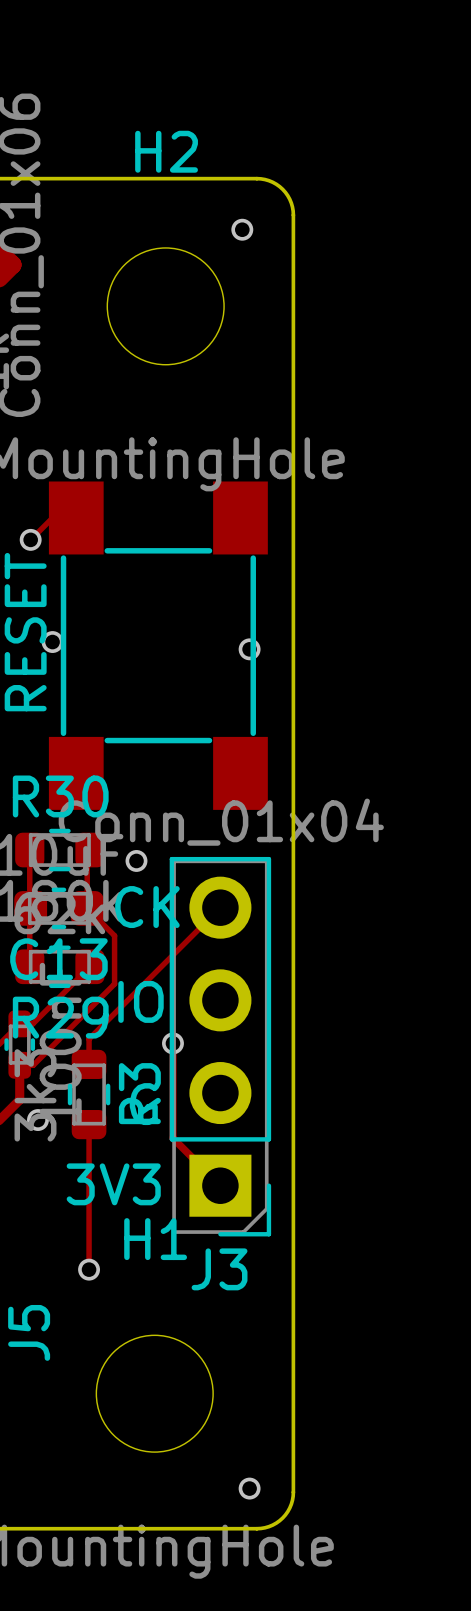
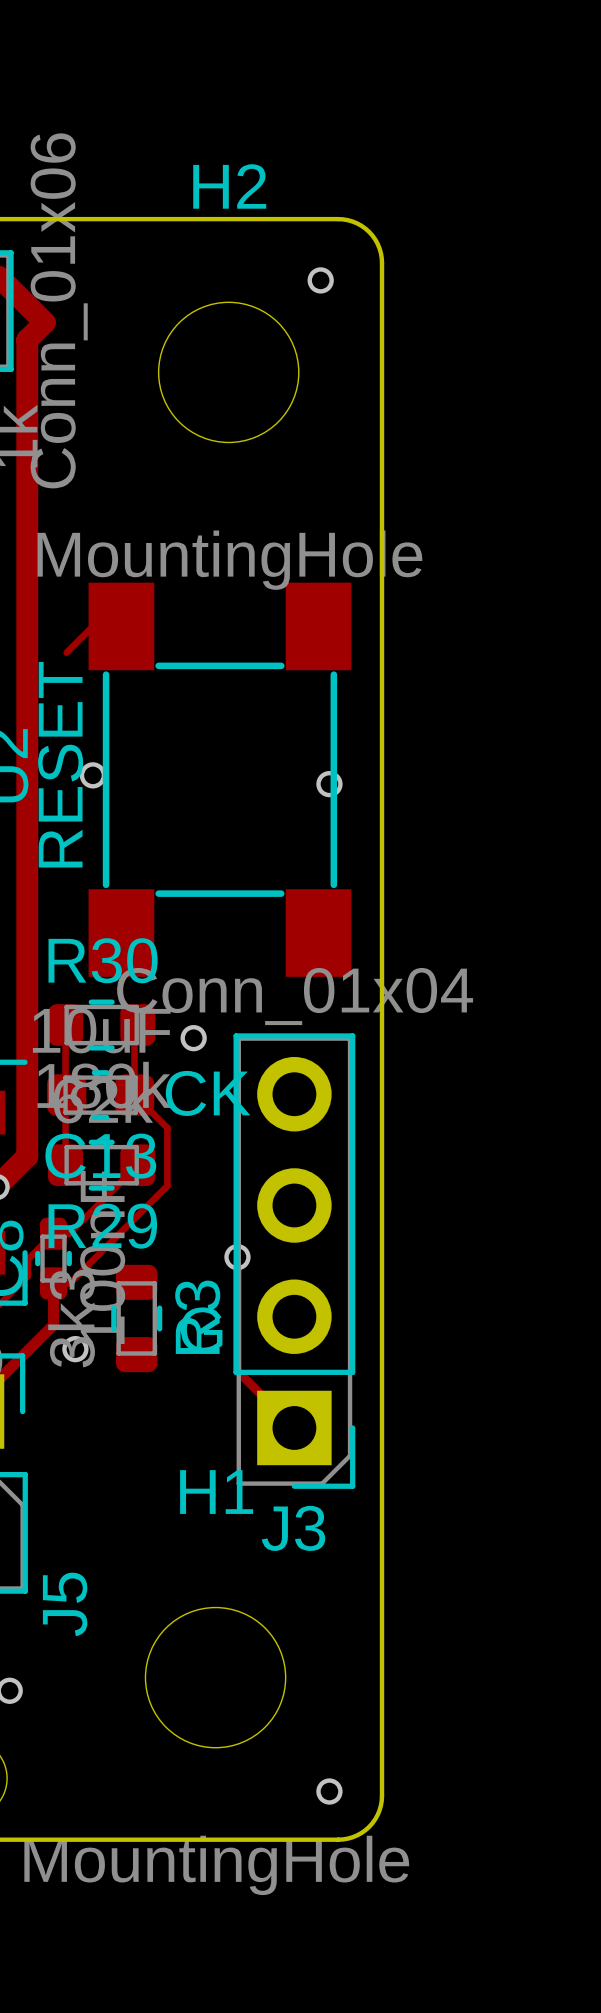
via: (30, 539) -> none
track: (220, 907) (89, 1039) (89, 1064) -> none
text: IO (141, 1001) -> none
track: (89, 1124) (89, 1269) -> none
text: 3V3 (113, 1184) -> none
via: (89, 1269) -> none

